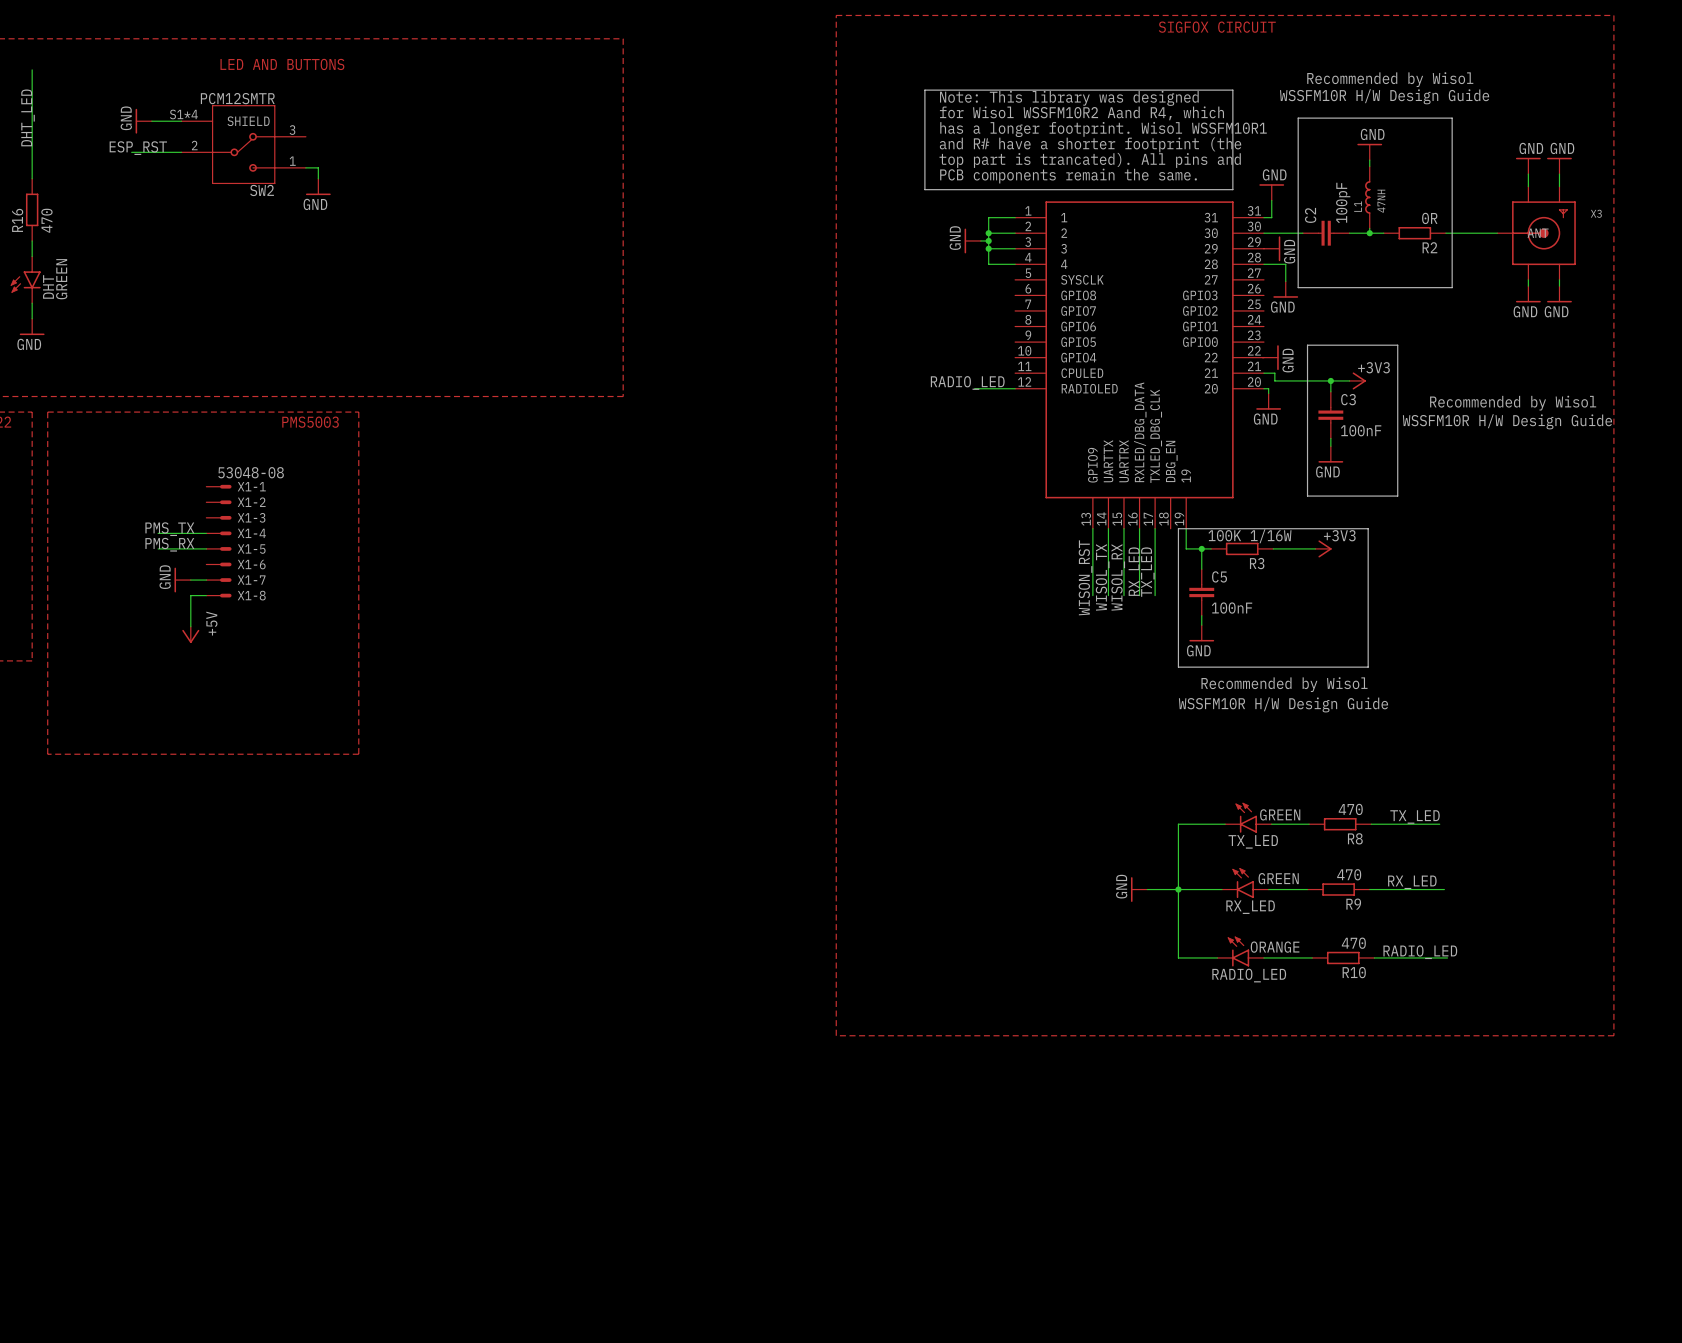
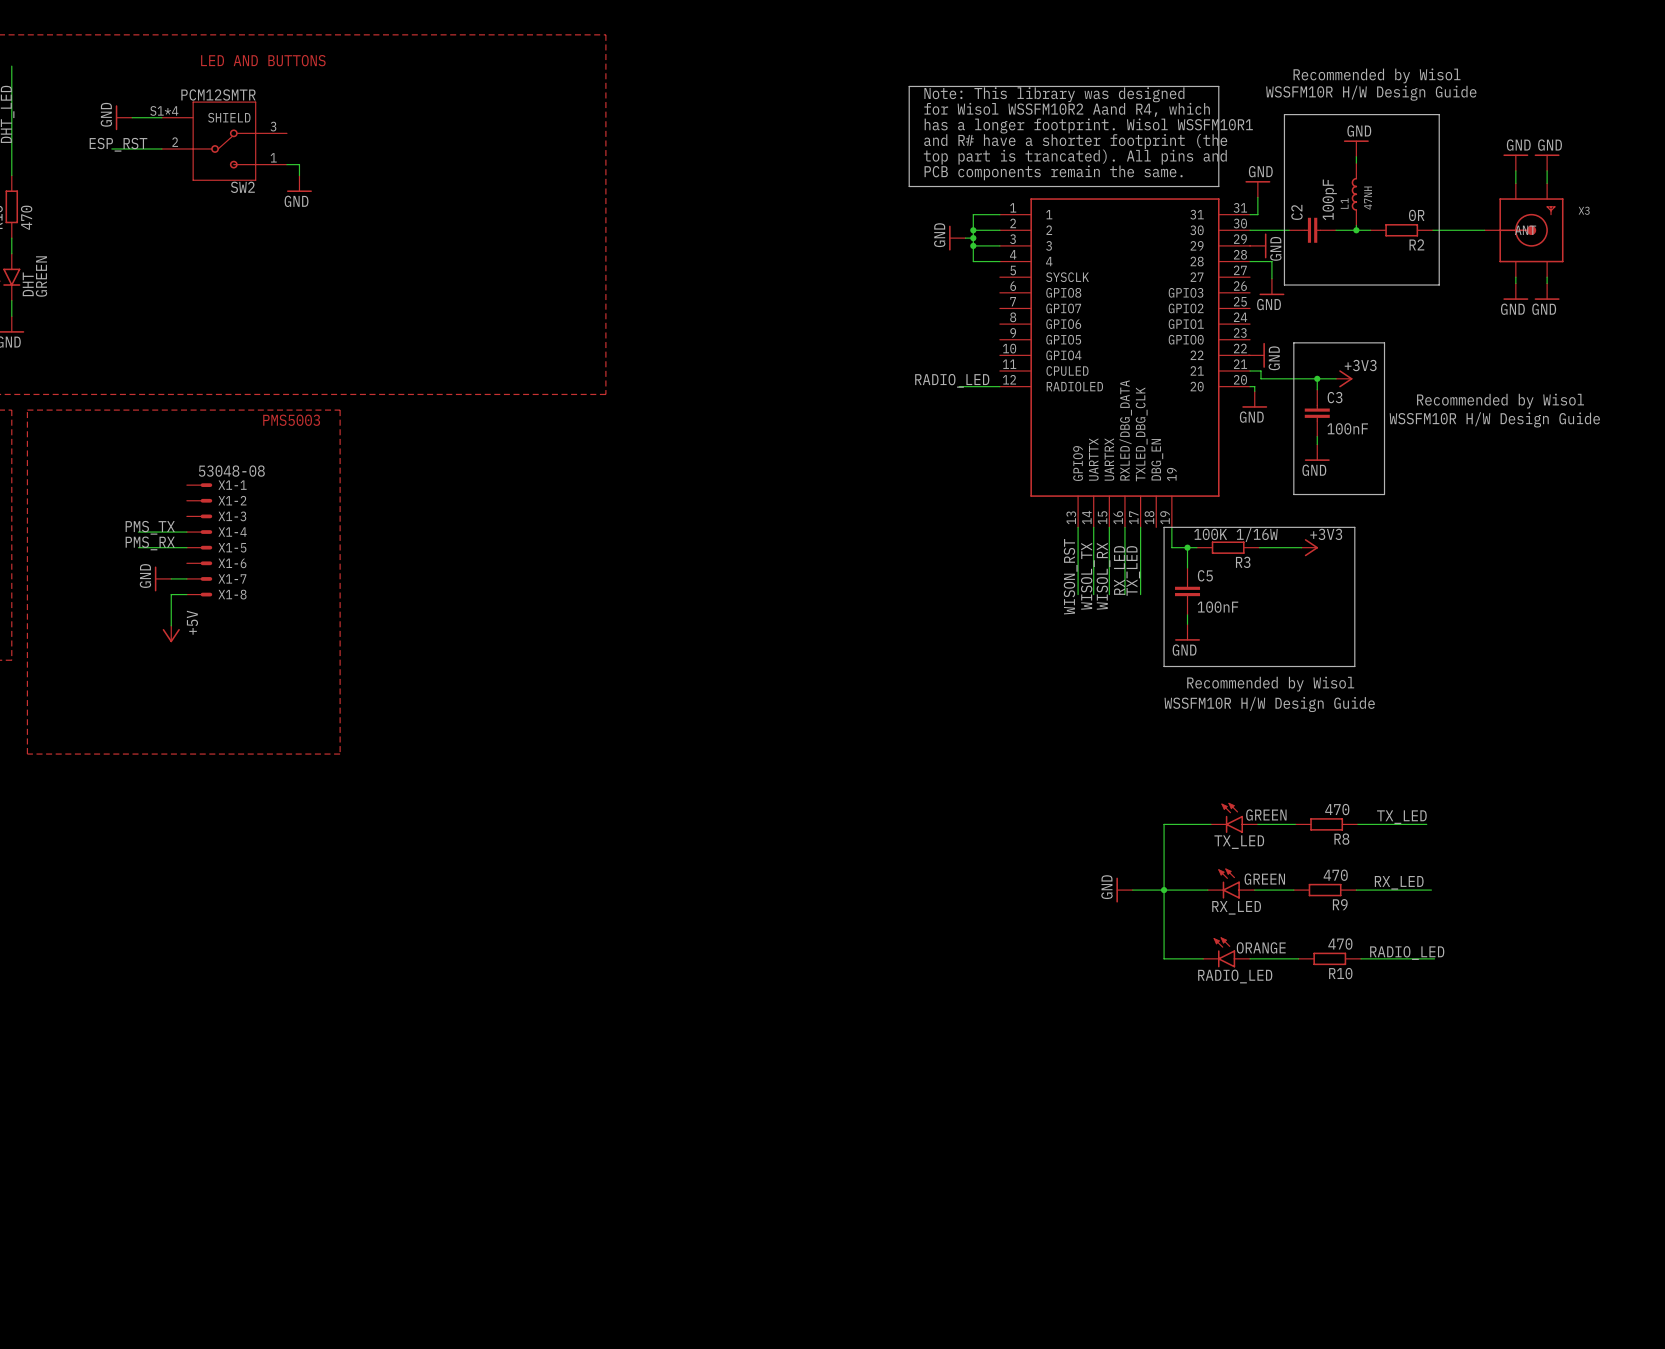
line: (836, 15) (836, 1035) (1613, 1035) (1613, 15) (836, 15) -> none
text: SIGFOX CIRCUIT (1217, 27) -> none

